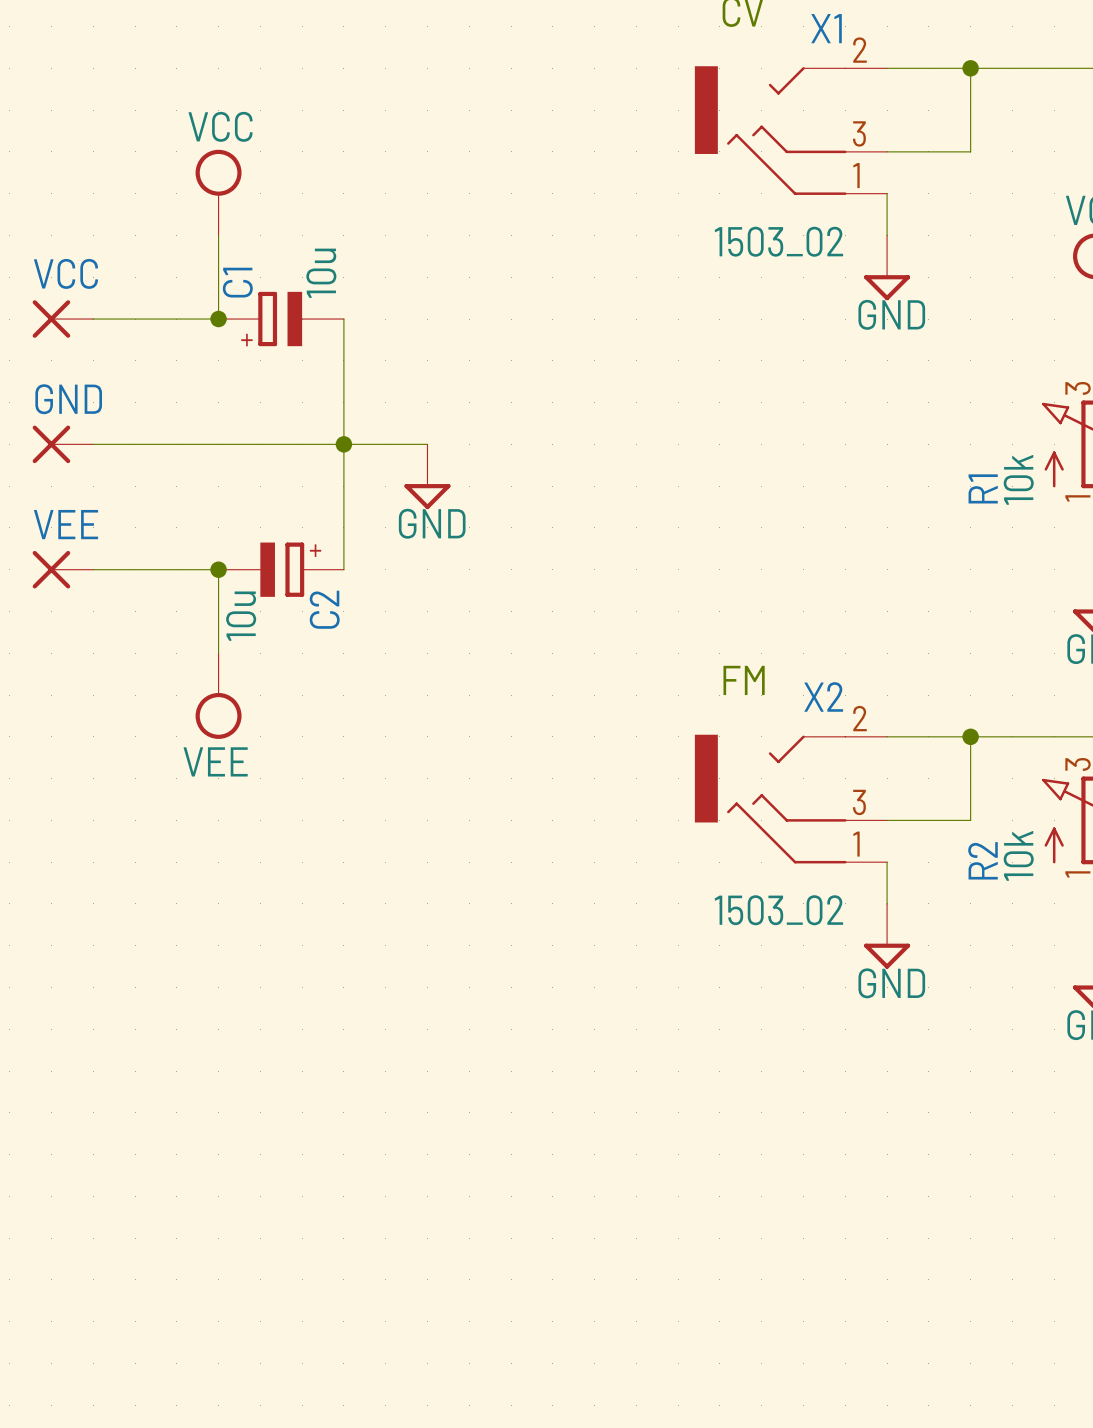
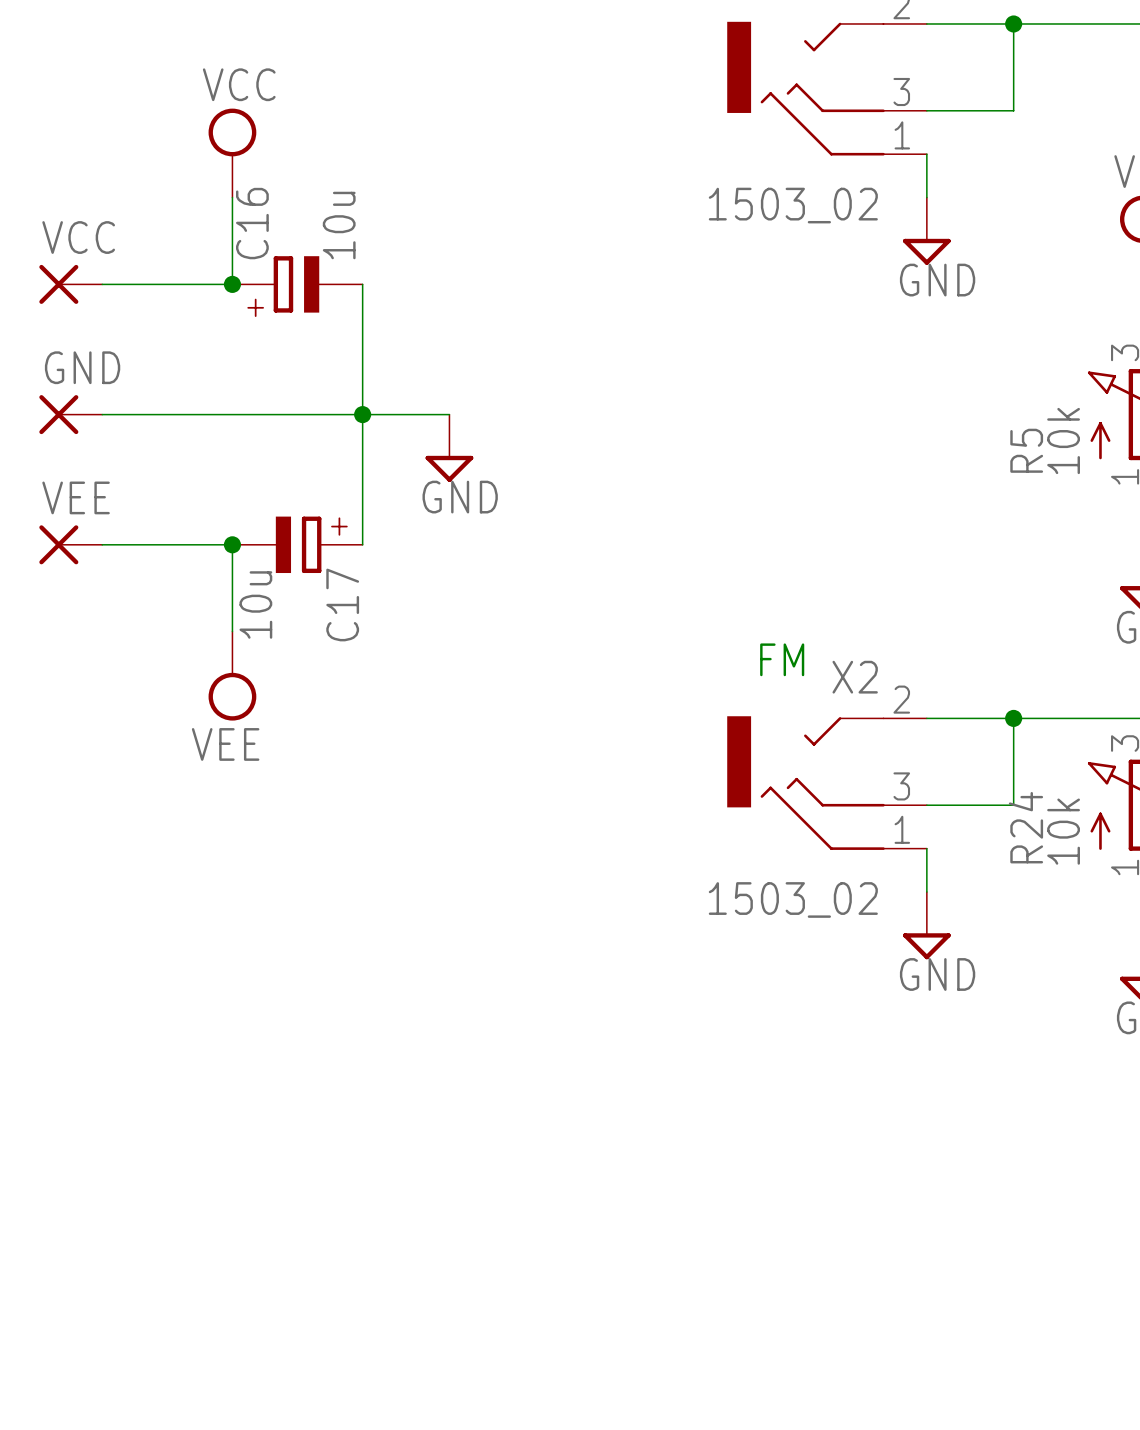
C1 name: C1 (237, 282) -> C16 (252, 223)
R1 name: R1 (983, 488) -> R5 (1026, 450)
C2 name: C2 (324, 609) -> C17 (342, 605)
R2 name: R2 (983, 860) -> R24 (1025, 827)

